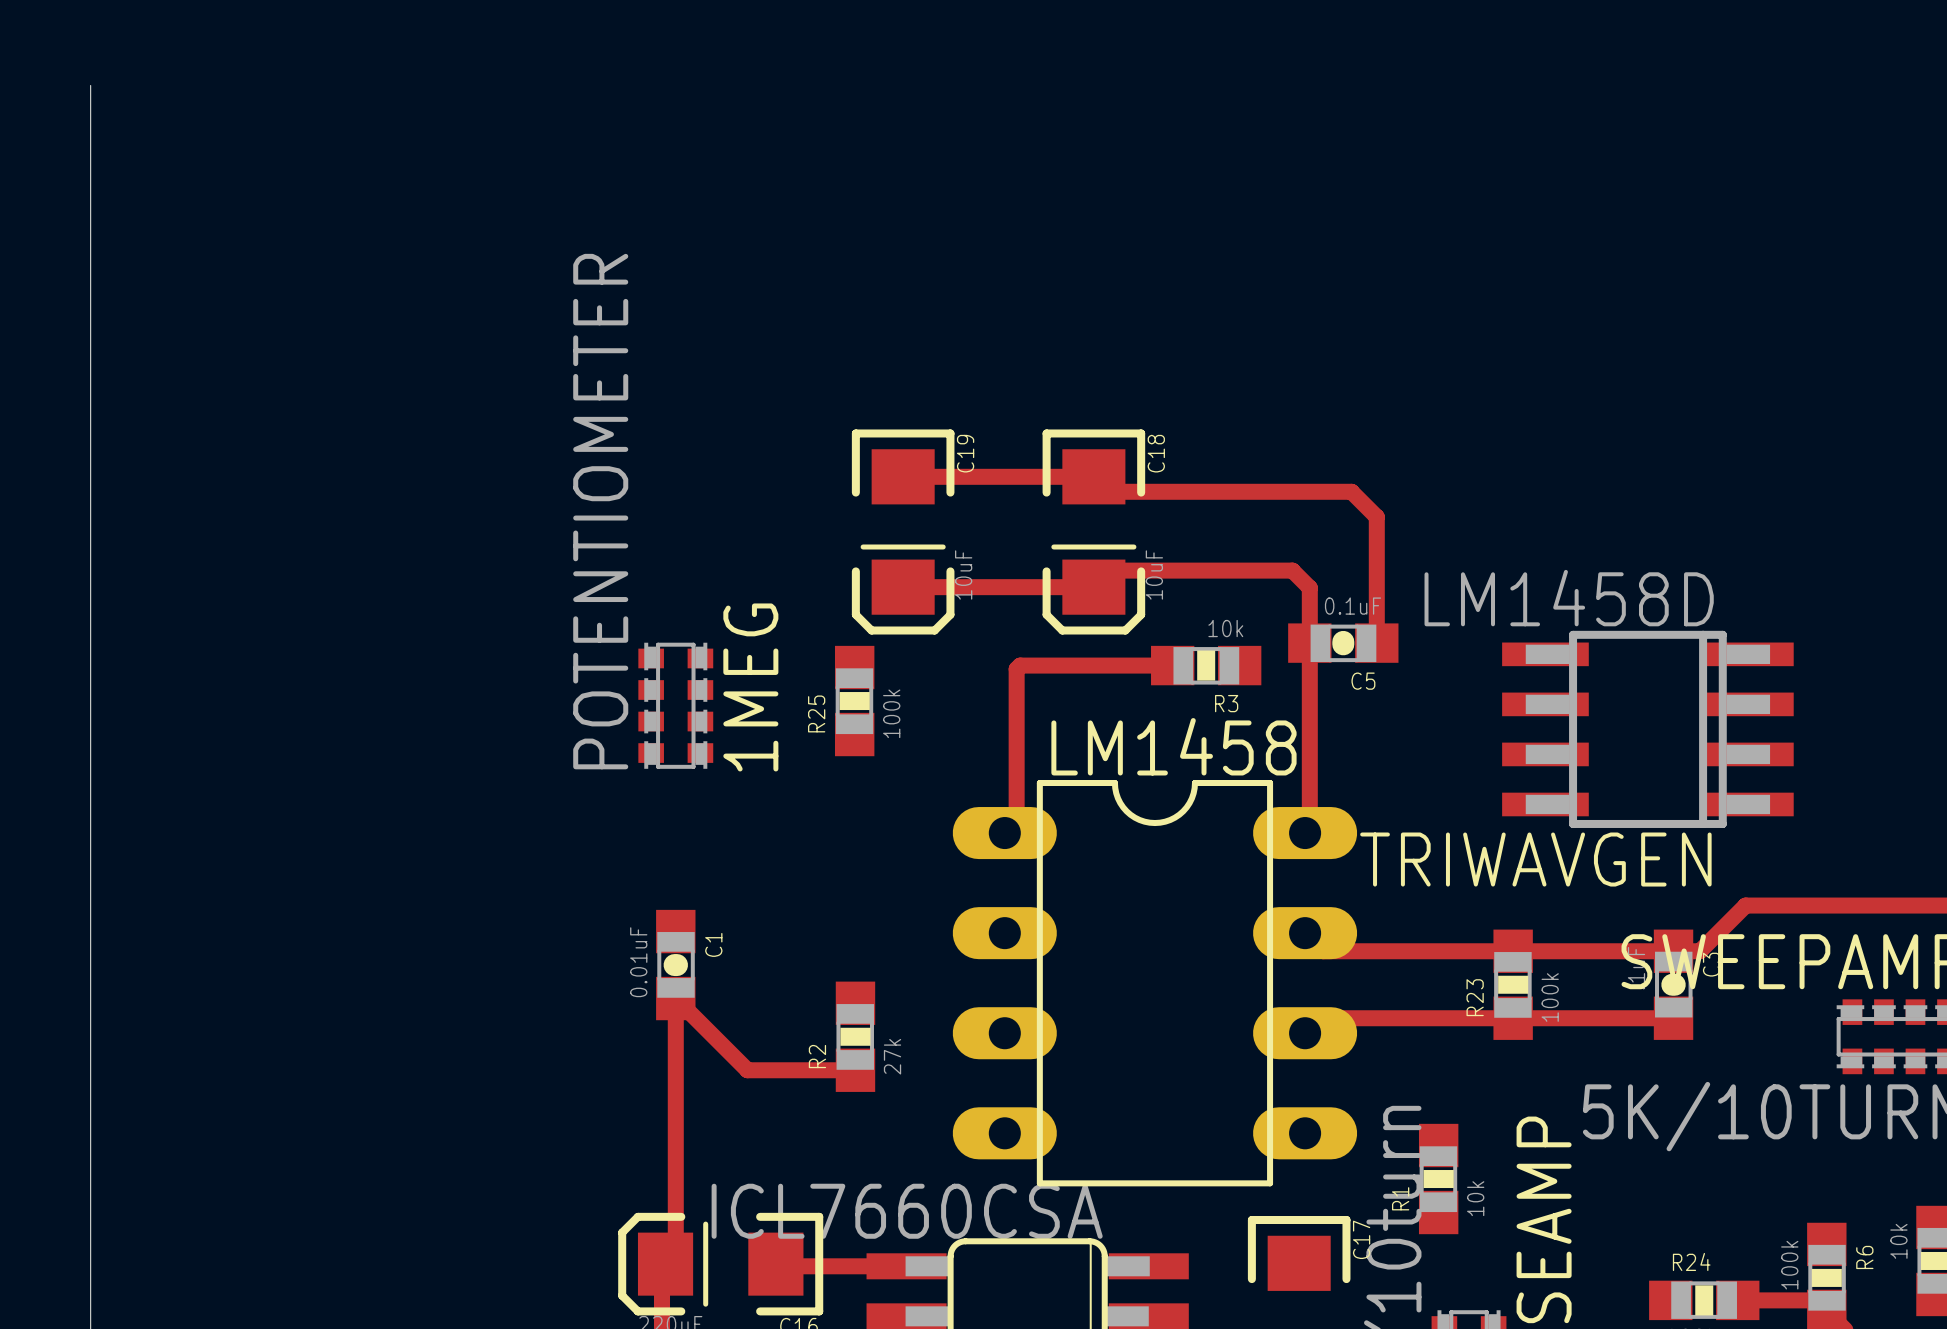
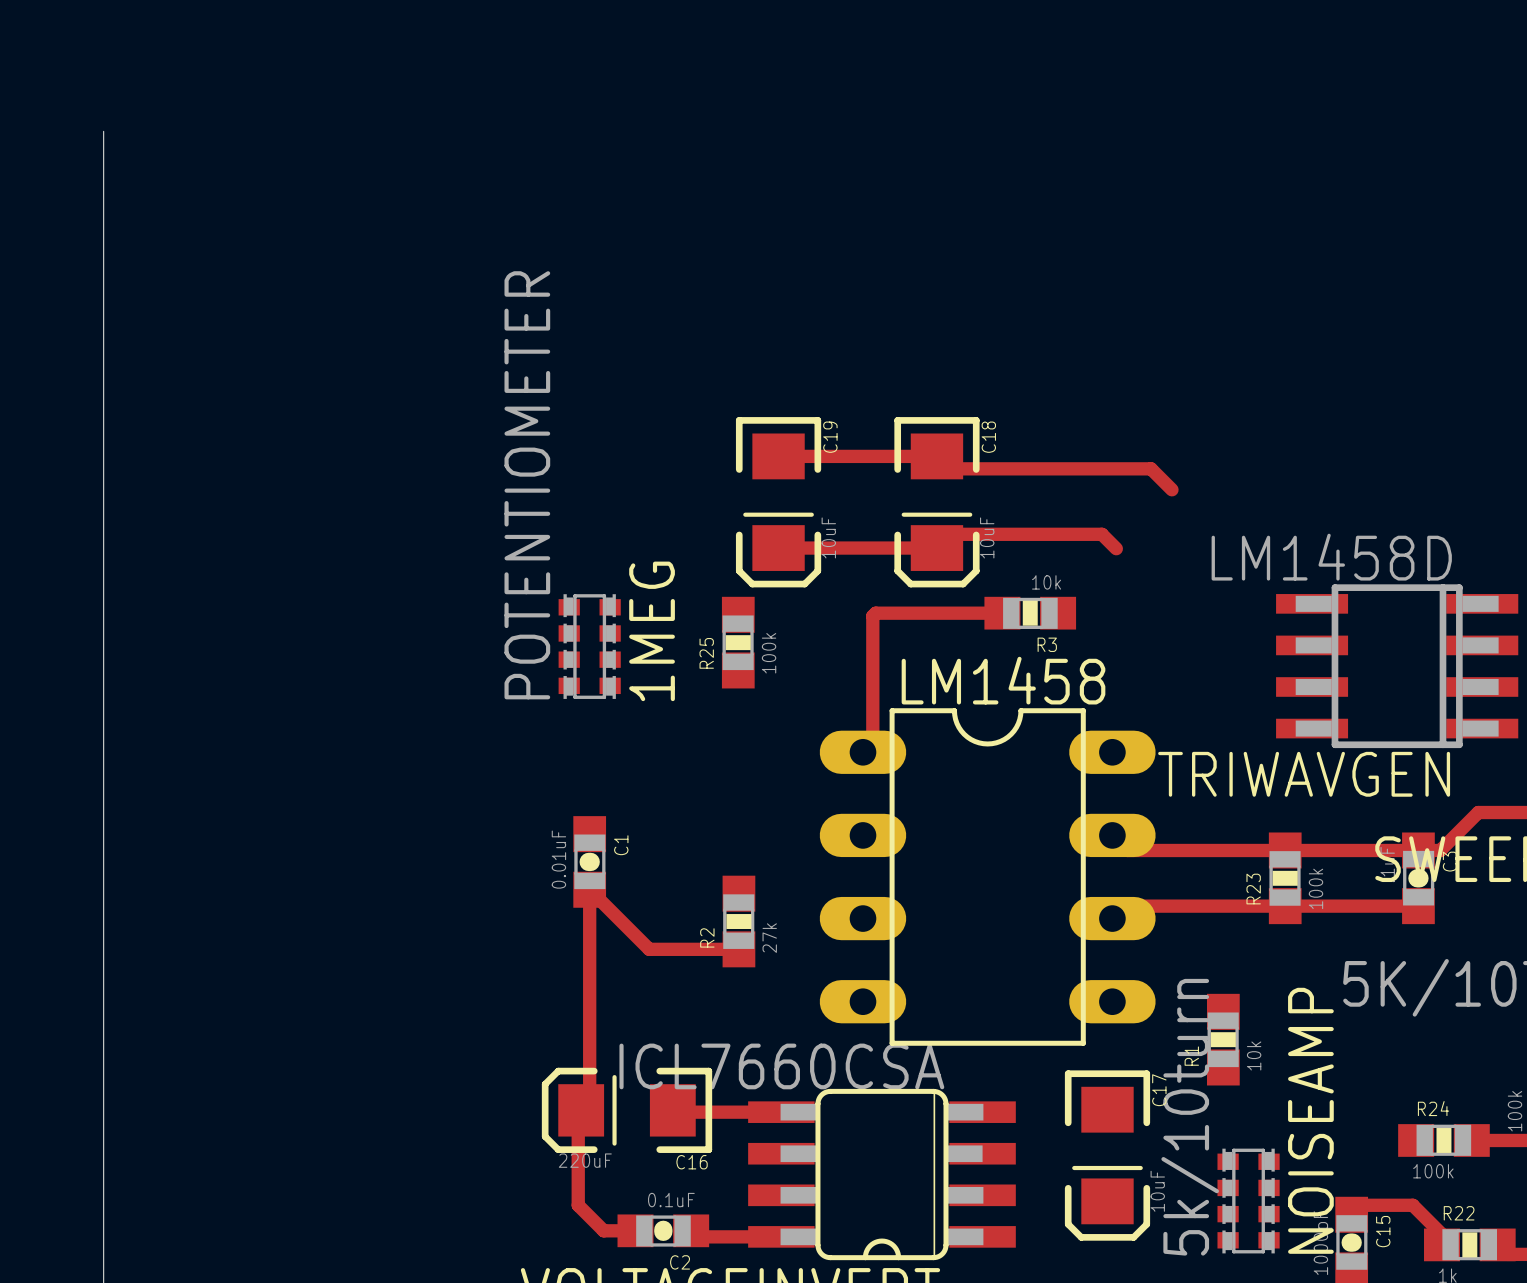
top track: (1376, 517) (1376, 643) -> none
top track: (1309, 587) (1309, 828) -> none
C5: 0.1uF (1343, 643) -> none

